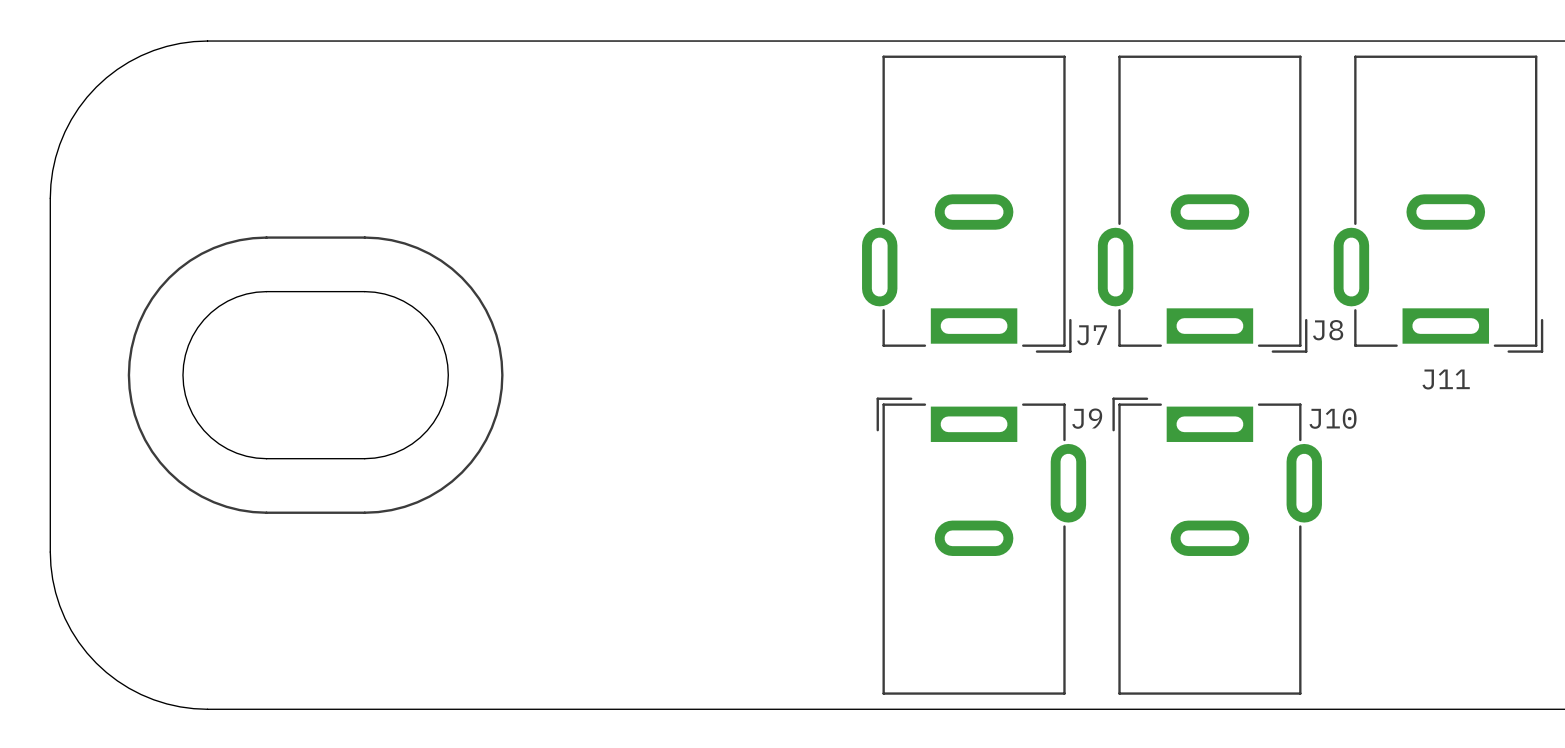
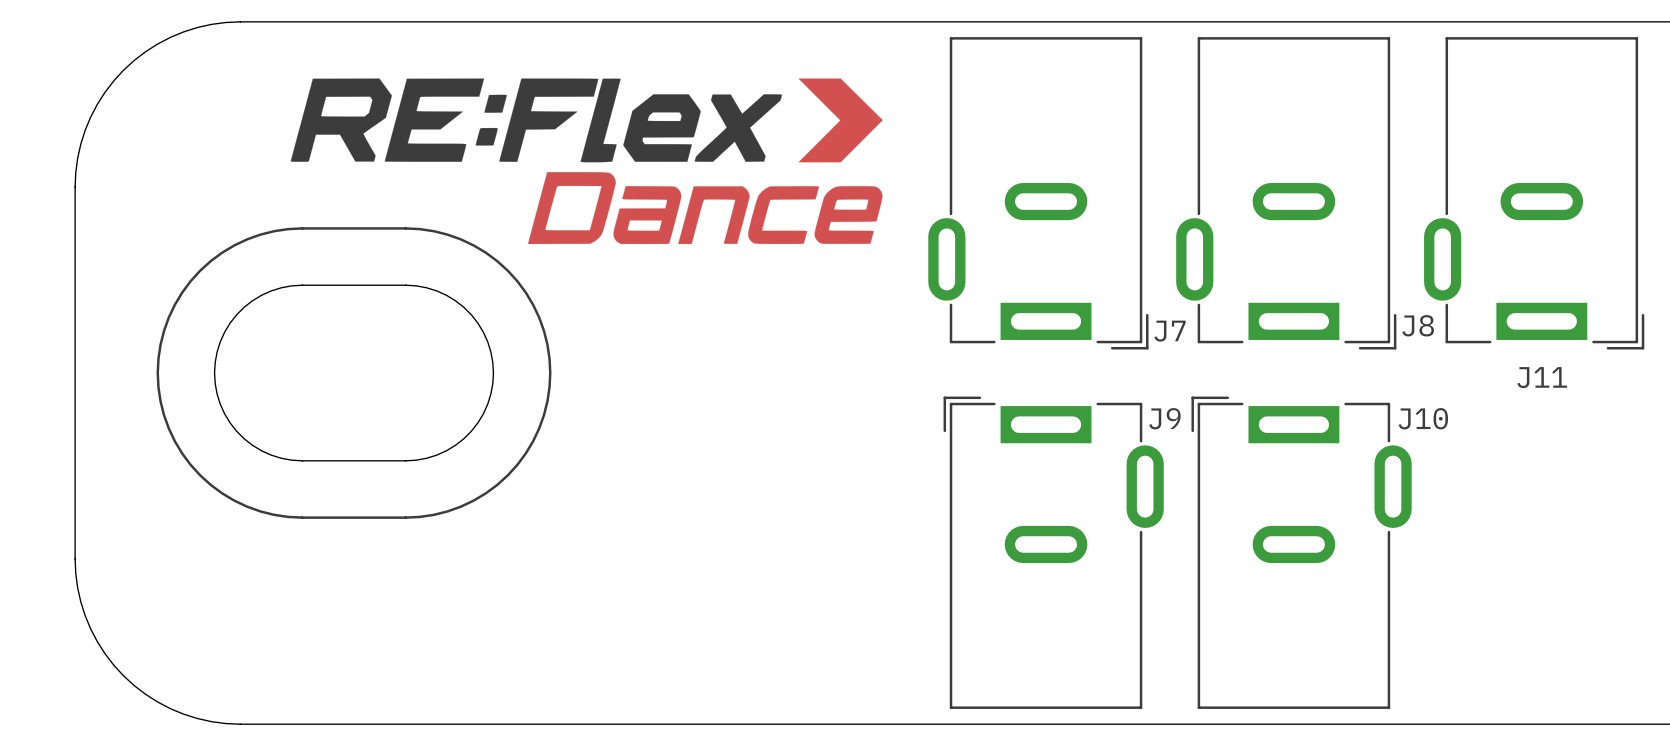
drawing: none -> [290, 78, 883, 245]

